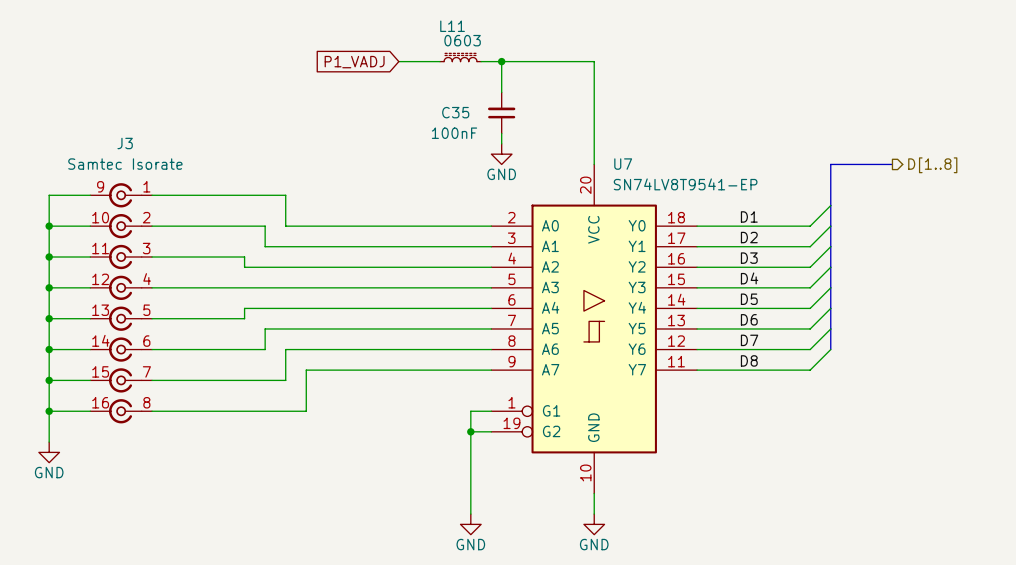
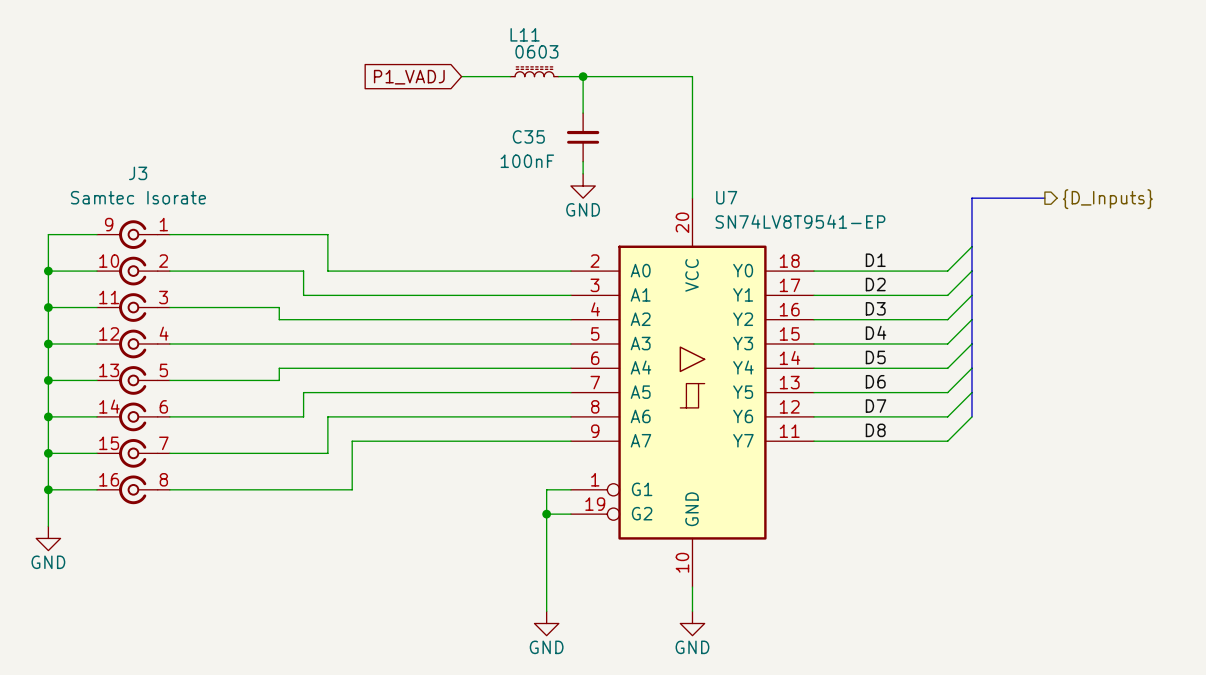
hierarchical label: D[1..8] (932, 165) -> {D_Inputs} (1107, 199)

